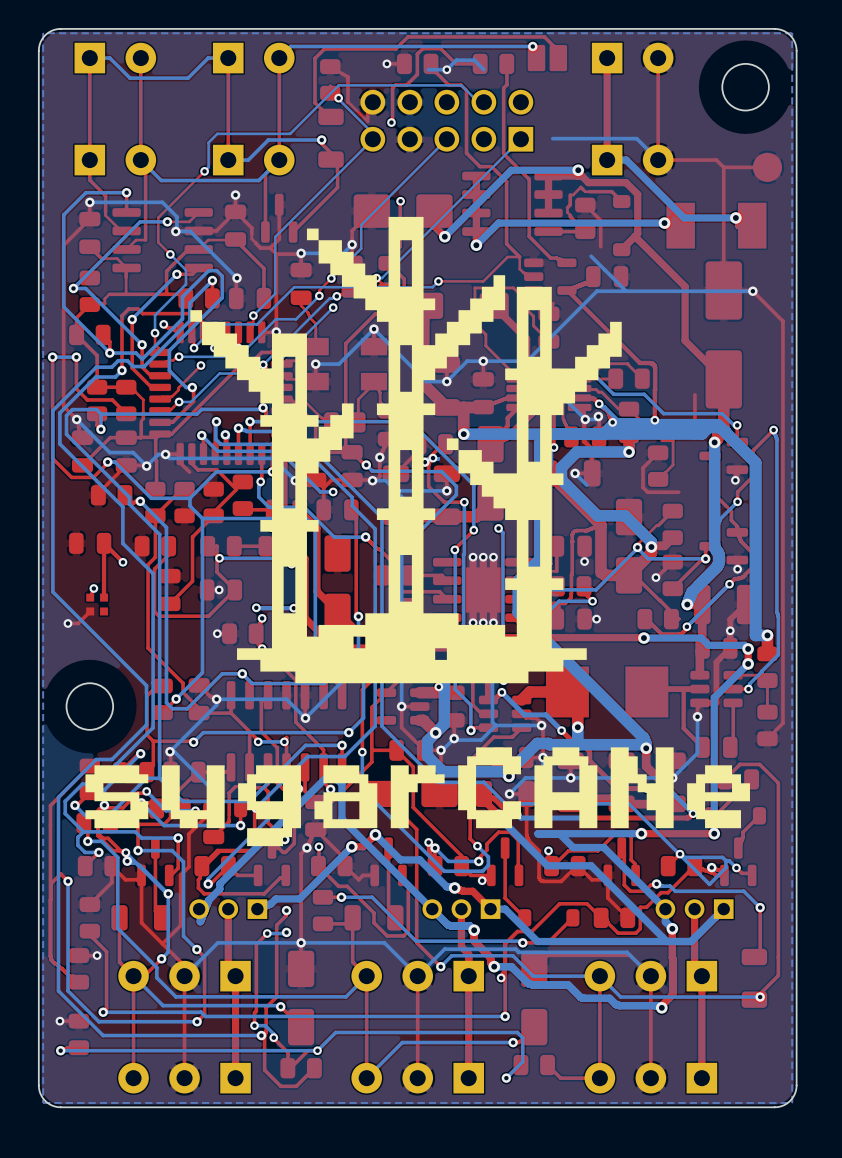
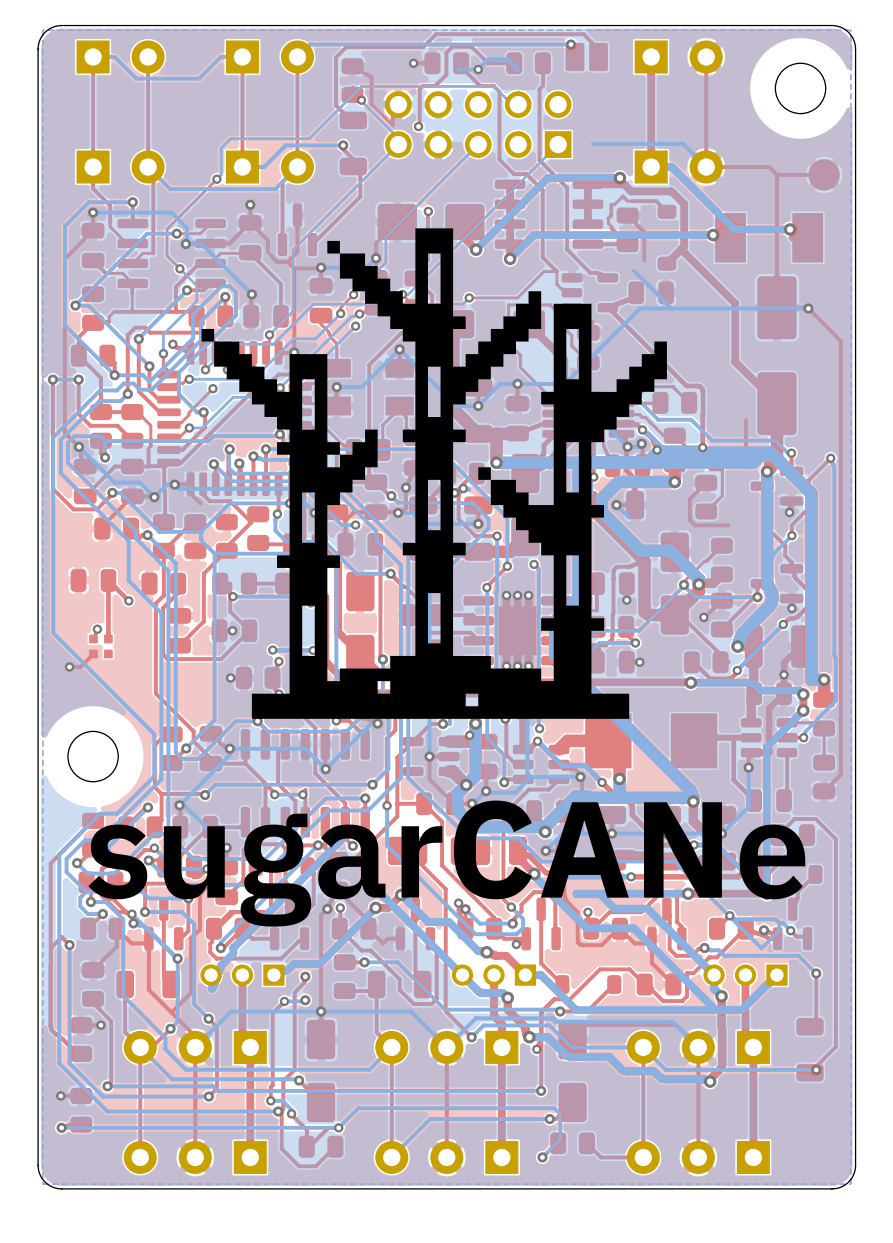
drawing shape: [202, 216, 622, 684] -> [214, 228, 667, 719]
drawing: none -> [318, 800, 629, 900]
drawing: [314, 747, 598, 829] -> none
drawing shape: [610, 747, 674, 829] -> [644, 802, 722, 898]
drawing shape: [85, 765, 149, 829] -> [88, 824, 148, 900]
drawing shape: [161, 765, 225, 829] -> [163, 826, 225, 900]
drawing shape: [238, 765, 301, 847] -> [240, 813, 312, 927]
drawing shape: [687, 765, 750, 829] -> [739, 824, 806, 900]

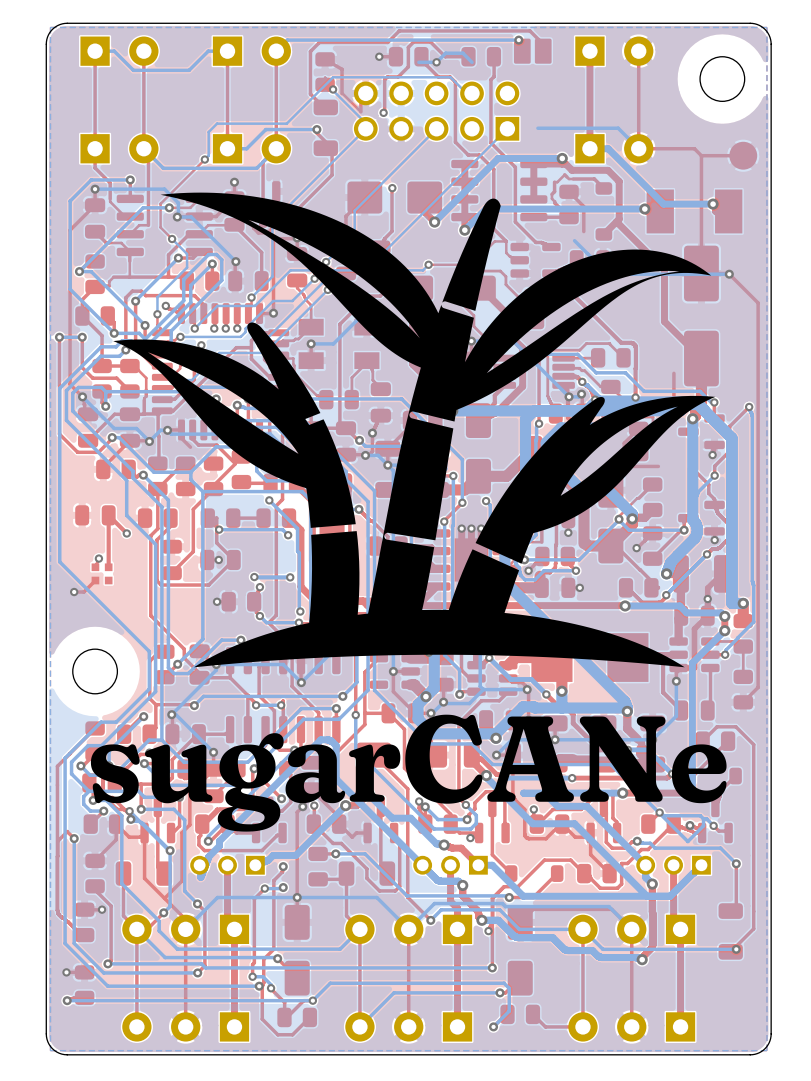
drawing: none -> [442, 198, 501, 311]
drawing: [201, 228, 667, 719] -> none
drawing: none -> [113, 322, 356, 528]
drawing: none -> [475, 395, 716, 564]
drawing shape: [478, 467, 491, 480] -> [160, 192, 712, 668]
drawing shape: [453, 800, 533, 900] -> [405, 714, 483, 804]
drawing shape: [540, 802, 629, 898] -> [487, 716, 574, 802]
drawing shape: [644, 802, 722, 898] -> [579, 716, 666, 802]
drawing shape: [240, 813, 312, 927] -> [217, 733, 284, 832]
drawing shape: [88, 824, 148, 900] -> [90, 744, 140, 804]
drawing shape: [318, 824, 386, 900] -> [285, 744, 346, 804]
drawing shape: [739, 824, 806, 900] -> [671, 744, 727, 804]
drawing shape: [163, 826, 225, 900] -> [145, 744, 213, 804]
drawing: [401, 826, 443, 898] -> none
drawing: none -> [349, 744, 401, 802]

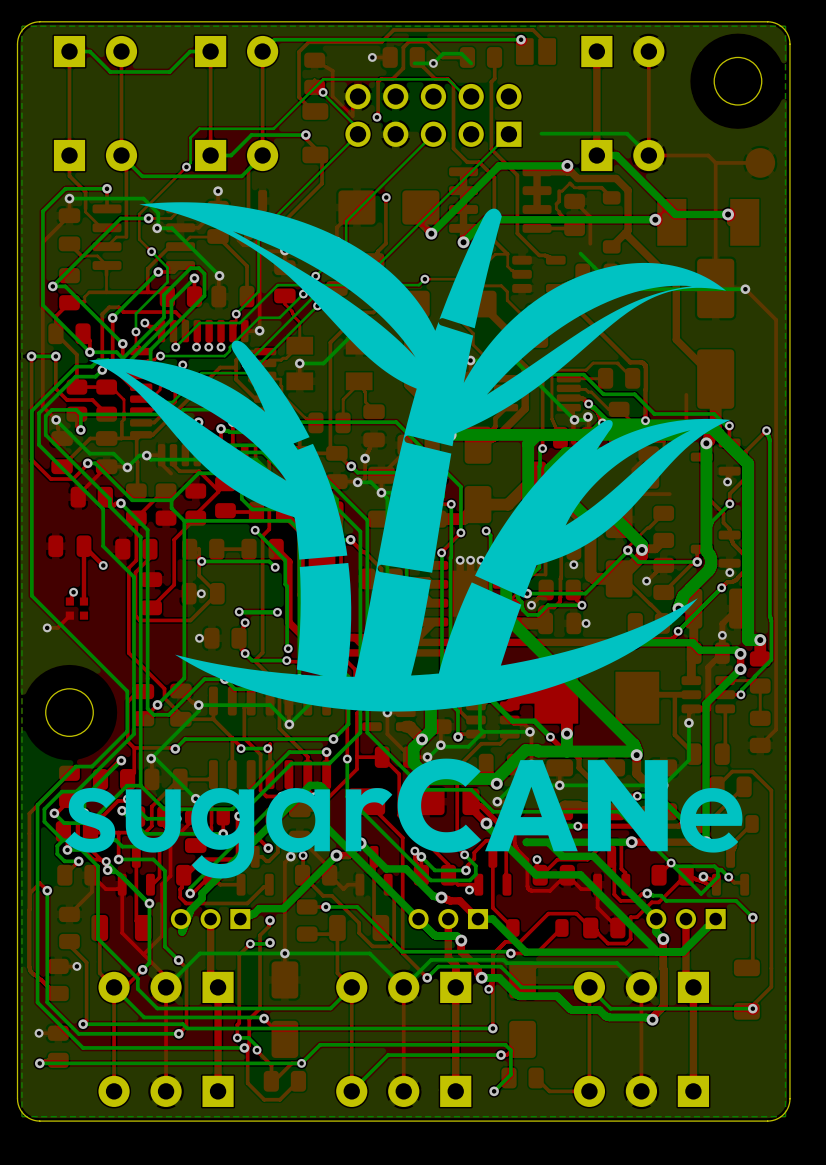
drawing shape: [160, 192, 712, 668] -> [139, 202, 727, 712]
drawing shape: [405, 714, 483, 804] -> [397, 758, 482, 853]
drawing shape: [487, 716, 574, 802] -> [485, 760, 578, 852]
drawing shape: [579, 716, 666, 802] -> [587, 760, 668, 852]
drawing shape: [217, 733, 284, 832] -> [191, 788, 255, 879]
drawing shape: [90, 744, 140, 804] -> [65, 787, 116, 853]
drawing shape: [145, 744, 213, 804] -> [125, 789, 181, 853]
drawing shape: [285, 744, 346, 804] -> [266, 788, 330, 853]
drawing shape: [349, 744, 401, 802] -> [345, 788, 393, 852]
drawing shape: [671, 744, 727, 804] -> [680, 788, 743, 853]

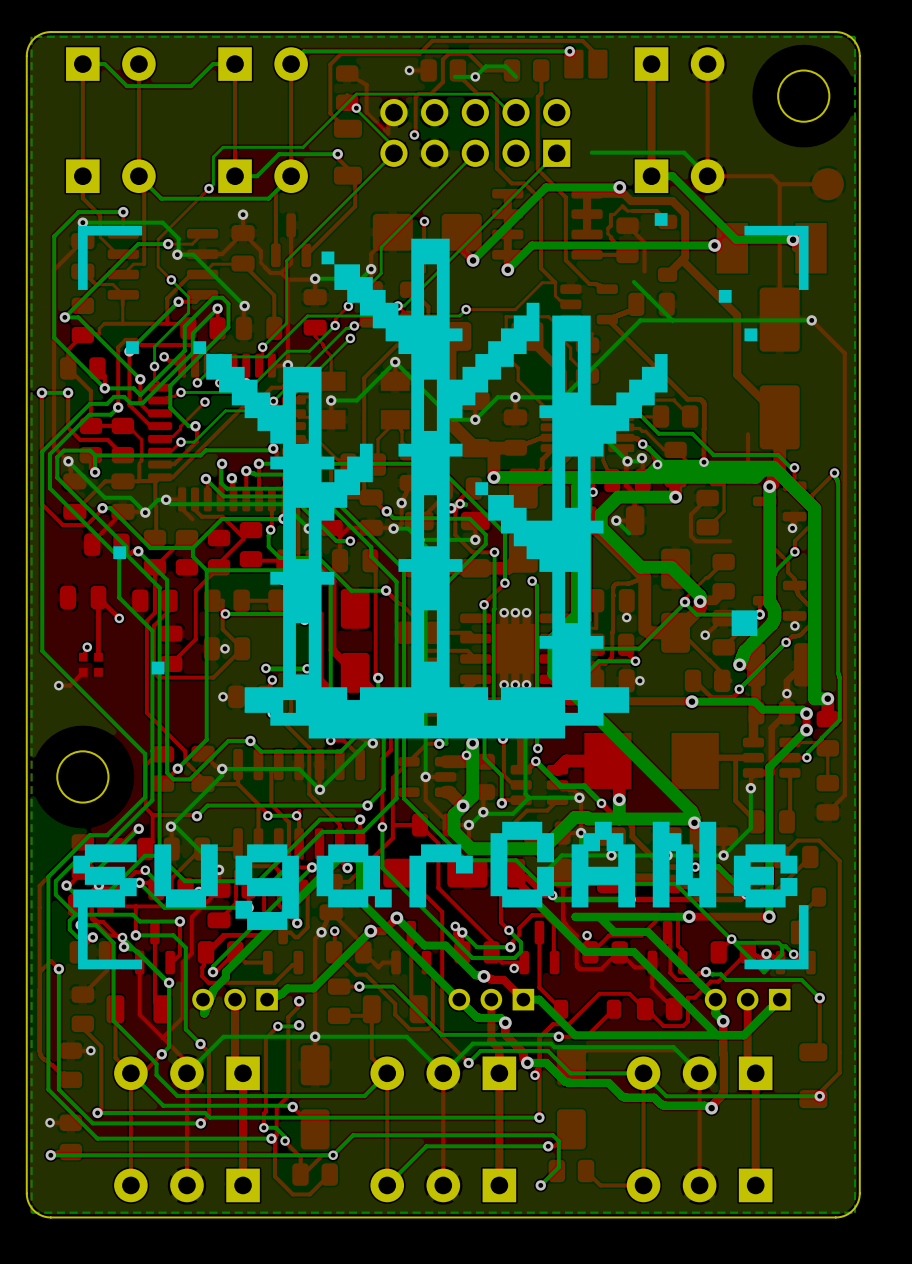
drawing: none -> [193, 213, 668, 739]
drawing: none -> [78, 225, 143, 290]
drawing: none -> [718, 225, 809, 303]
drawing shape: [139, 202, 727, 712] -> [475, 482, 489, 496]
drawing: [439, 208, 502, 329] -> none
drawing: none -> [744, 328, 758, 342]
drawing: none -> [126, 341, 139, 355]
drawing: [88, 340, 348, 560] -> none
drawing: [475, 418, 731, 598] -> none
drawing: none -> [113, 546, 127, 560]
drawing: none -> [731, 610, 758, 636]
drawing: none -> [151, 661, 165, 675]
drawing: none -> [154, 821, 636, 930]
drawing: [125, 758, 578, 879] -> none
drawing shape: [587, 760, 668, 852] -> [652, 821, 717, 908]
drawing: none -> [733, 844, 809, 970]
drawing shape: [65, 787, 116, 853] -> [73, 844, 143, 970]
drawing: [680, 788, 743, 853] -> none

